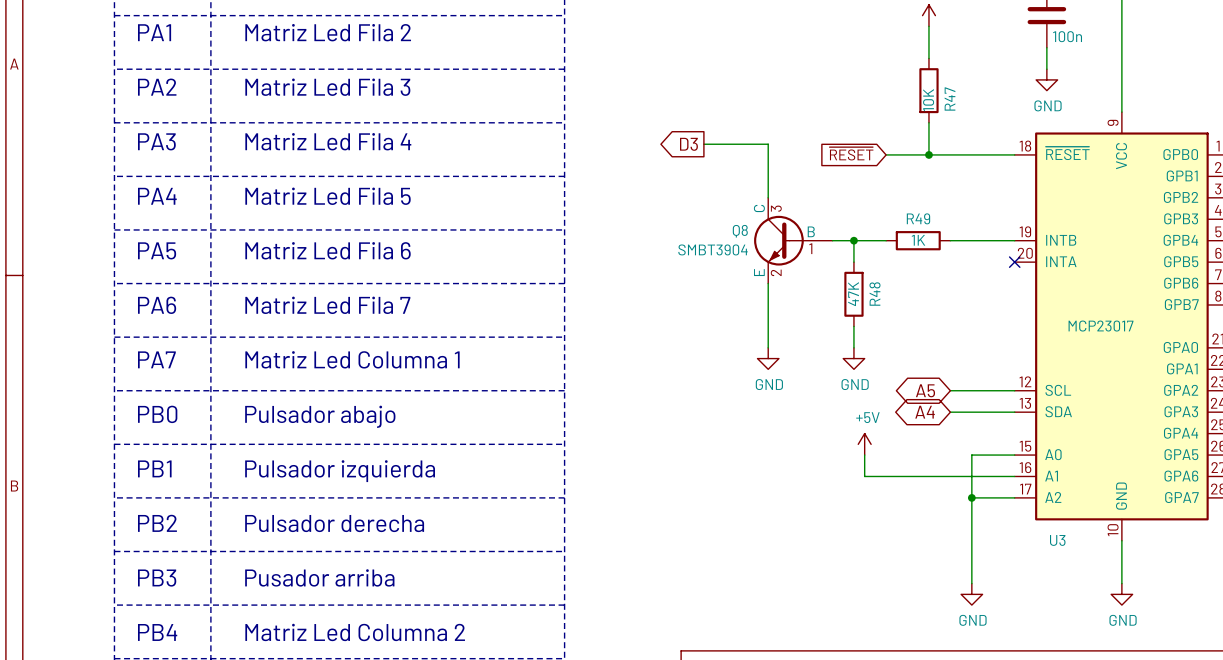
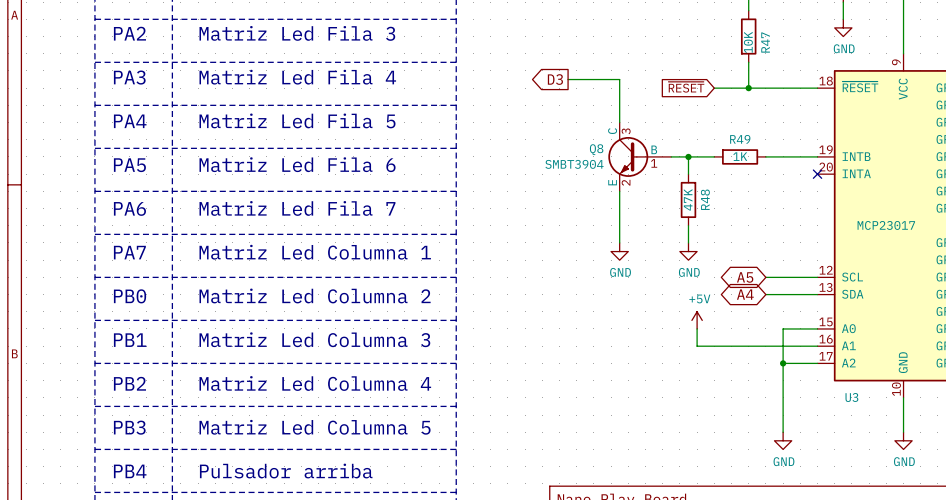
text: Pulsador abajo (320, 416) -> Matriz Led Columna 2 (315, 295)
text: Pulsador izquierda (340, 471) -> Matriz Led Columna 3 (314, 339)
text: Pulsador derecha (334, 523) -> Matriz Led Columna 4 (315, 383)
text: Pusador arriba (319, 577) -> Matriz Led Columna 5 (315, 427)
text: Matriz Led Columna 2 (355, 632) -> Pulsador arriba (286, 471)

